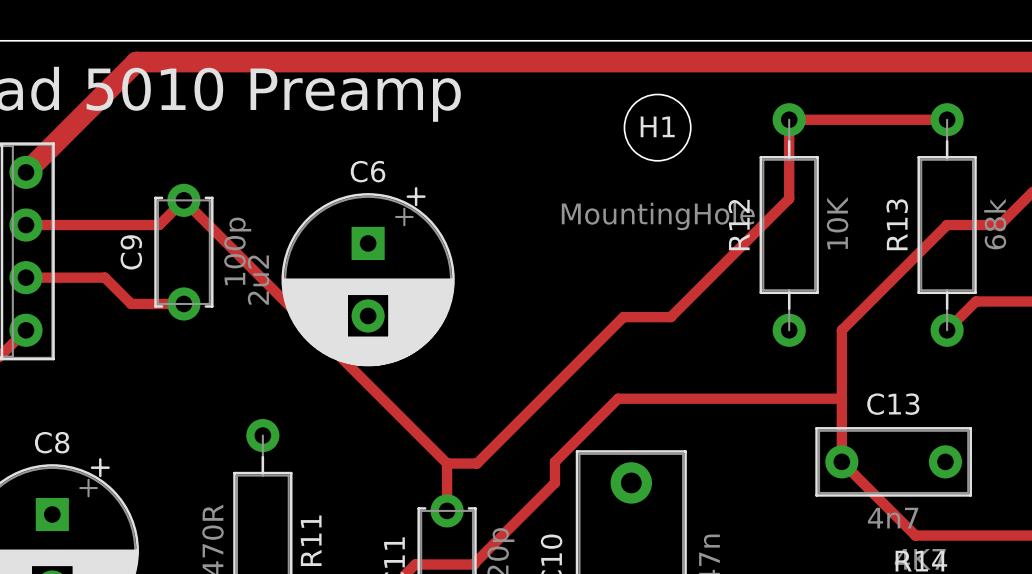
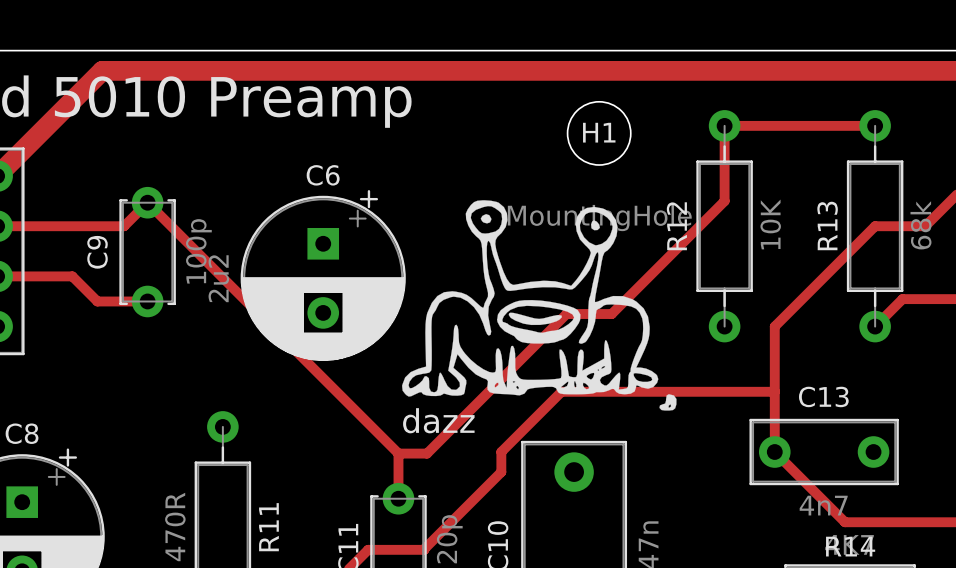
drawing: none -> [402, 200, 677, 411]
text: none -> dazz (438, 420)

